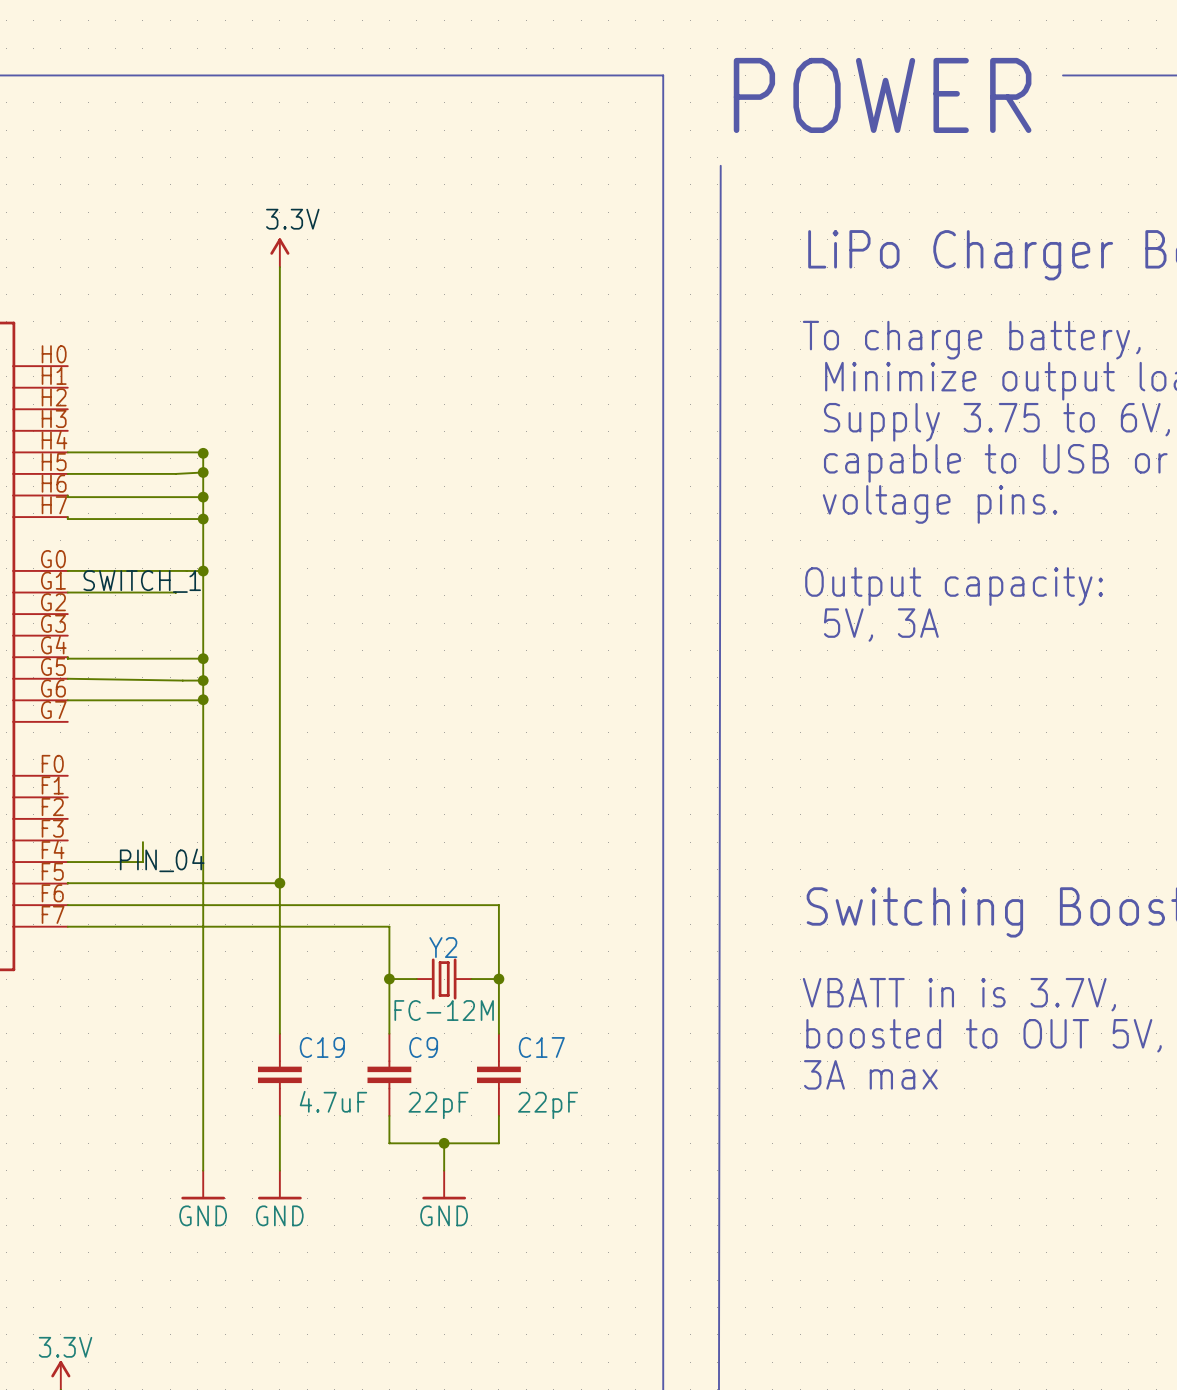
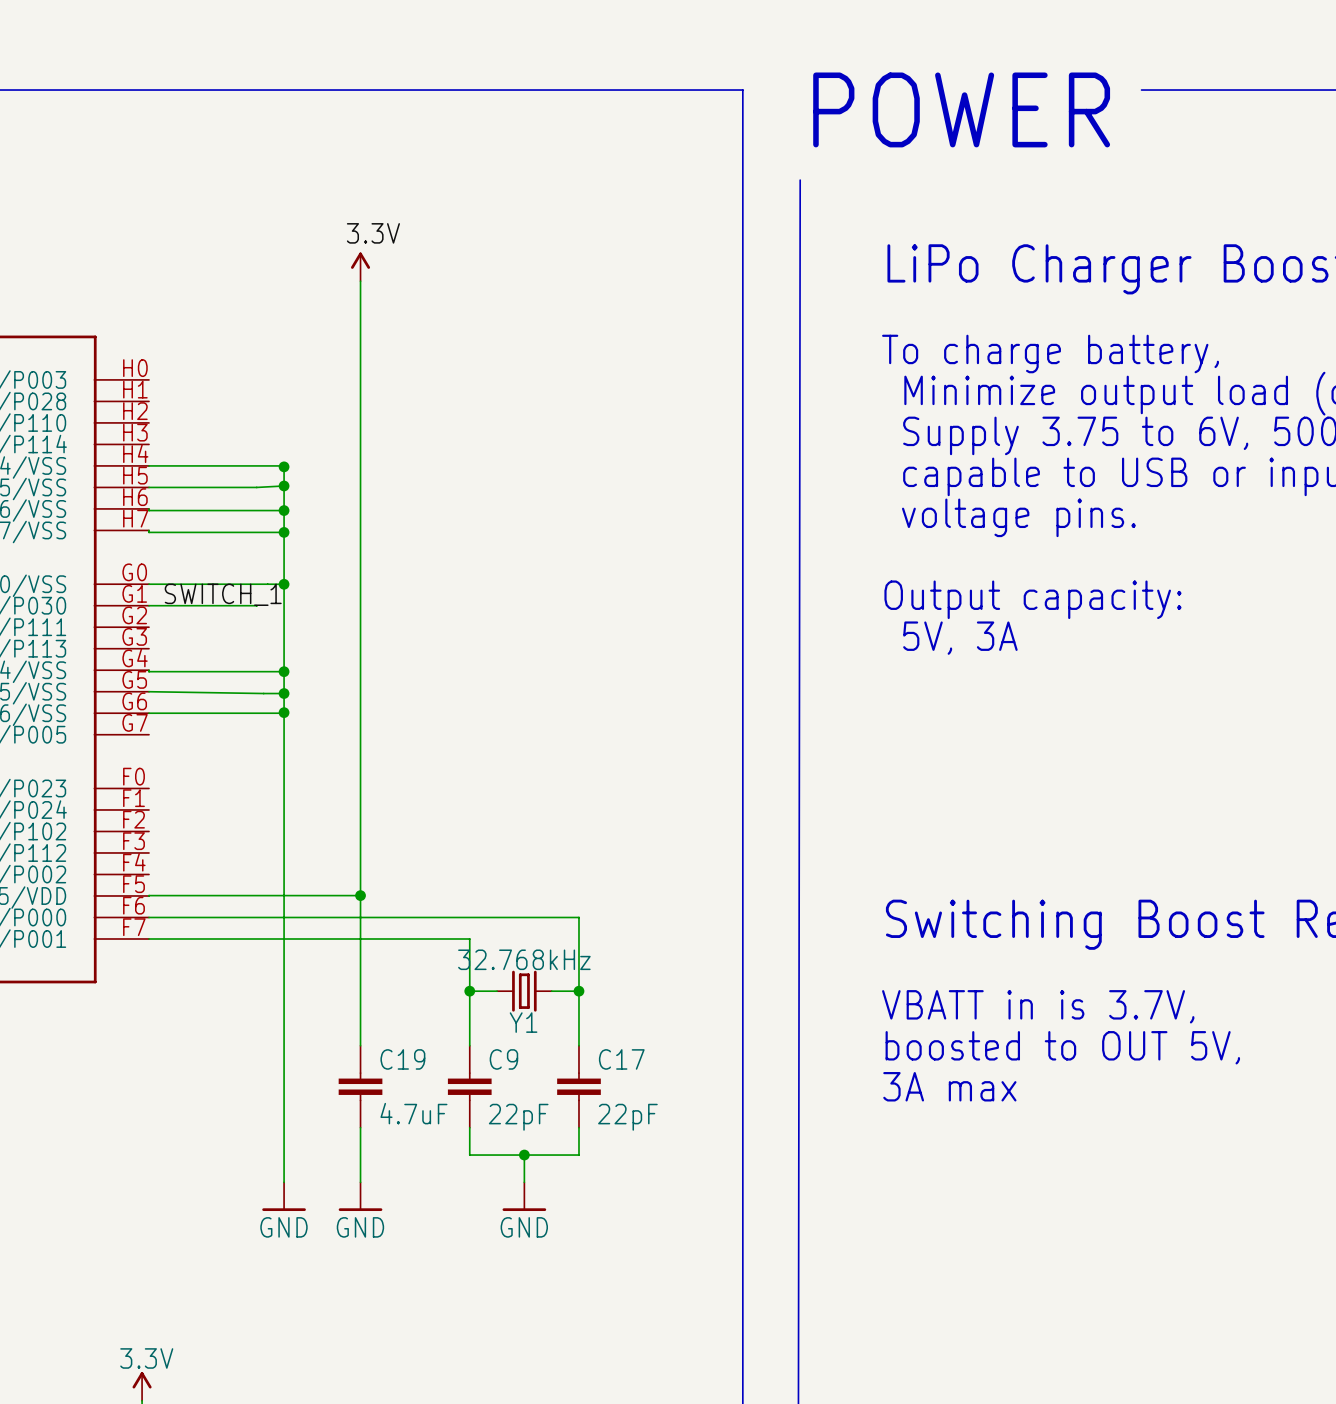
wire: (142, 842) (142, 862) (67, 862) -> none
label: PIN_04 (162, 860) -> none
Y2 name: Y2 (443, 947) -> Y1 (523, 1022)
Y2 value: FC-12M (444, 1010) -> 32.768kHz (524, 959)

